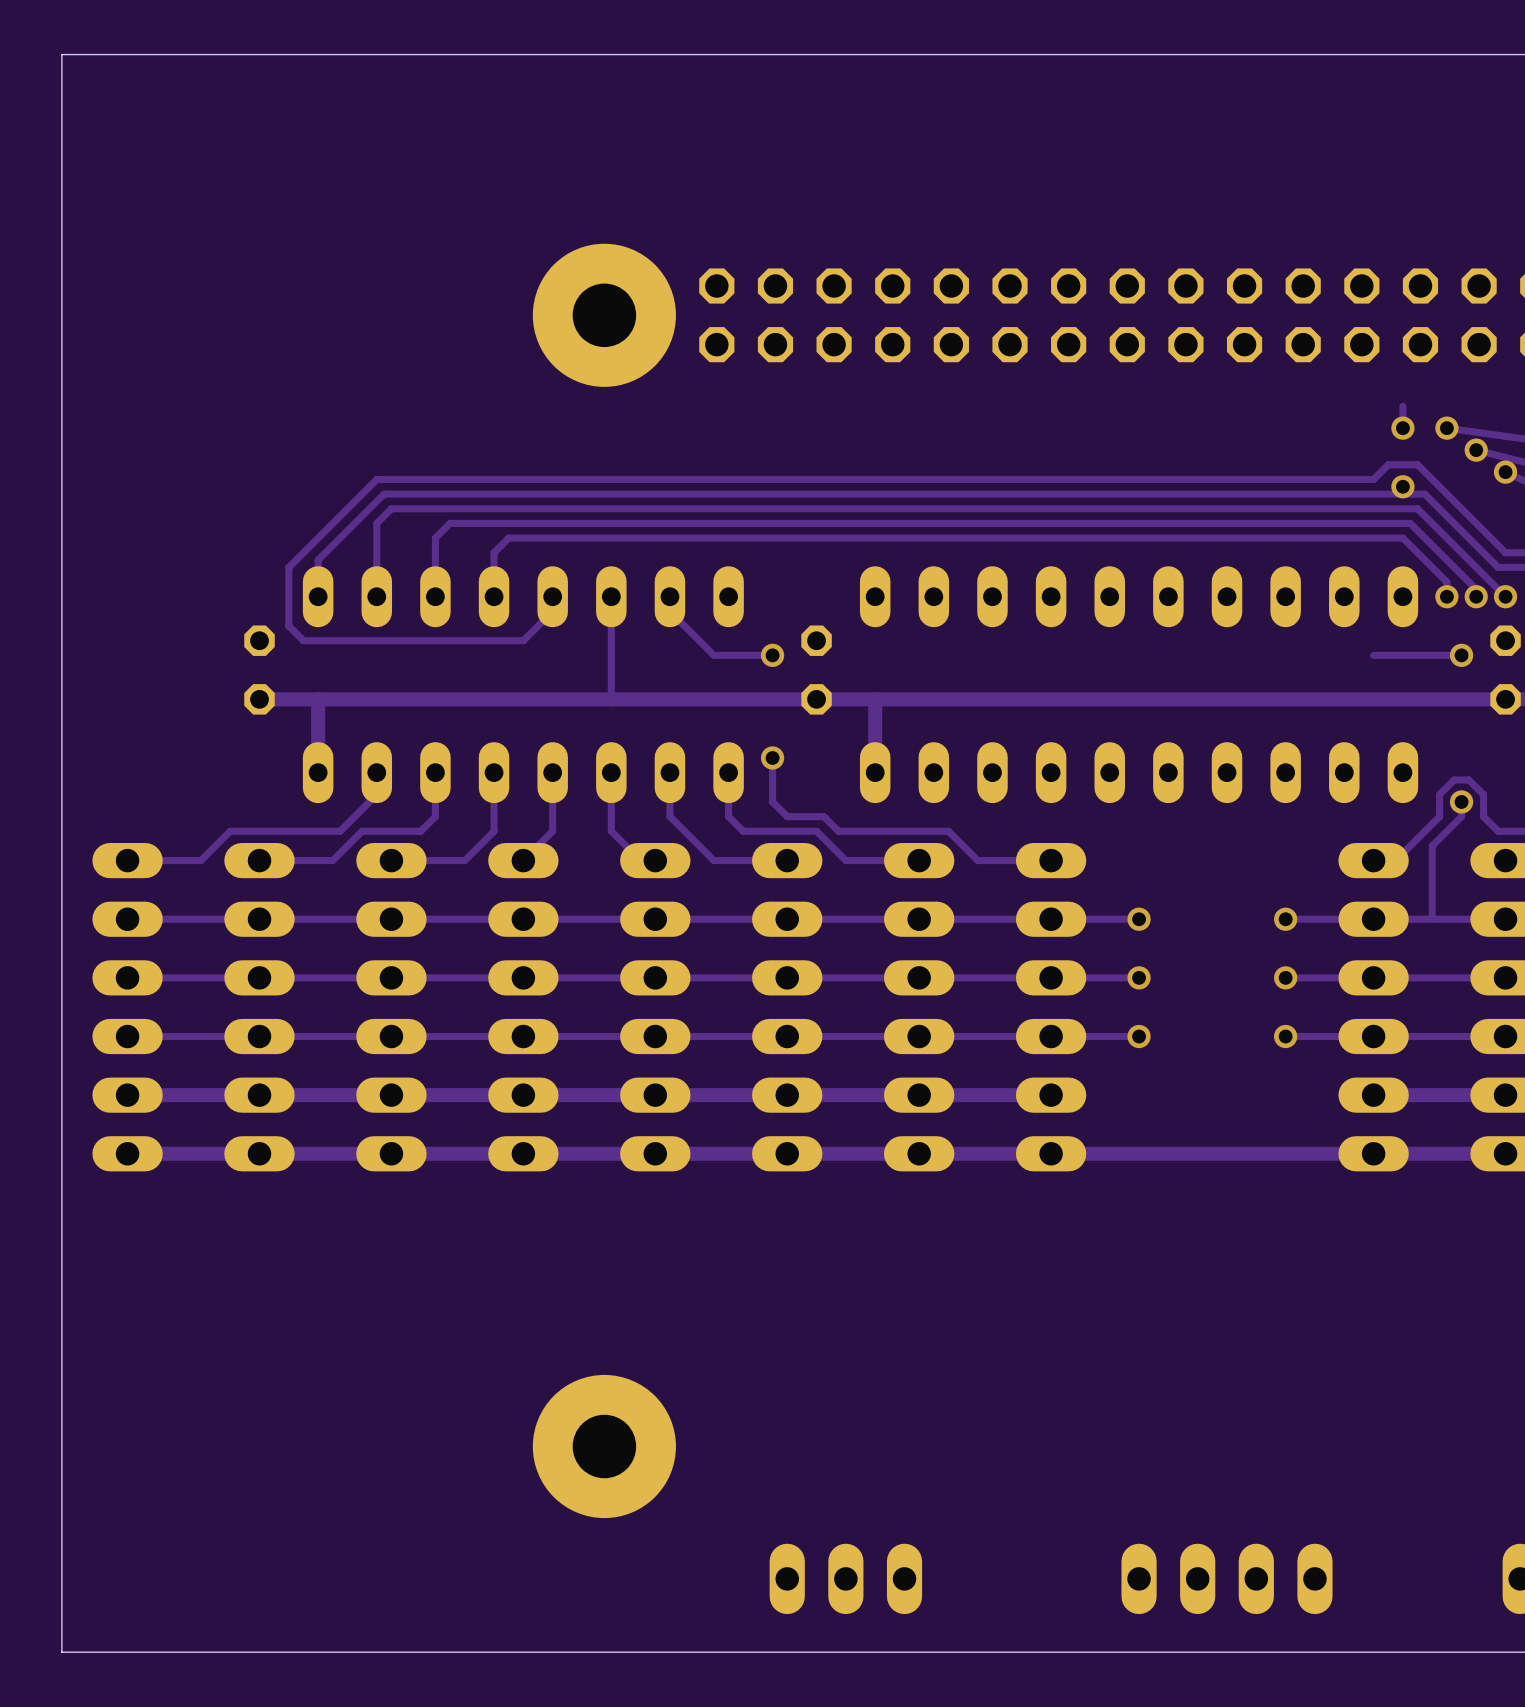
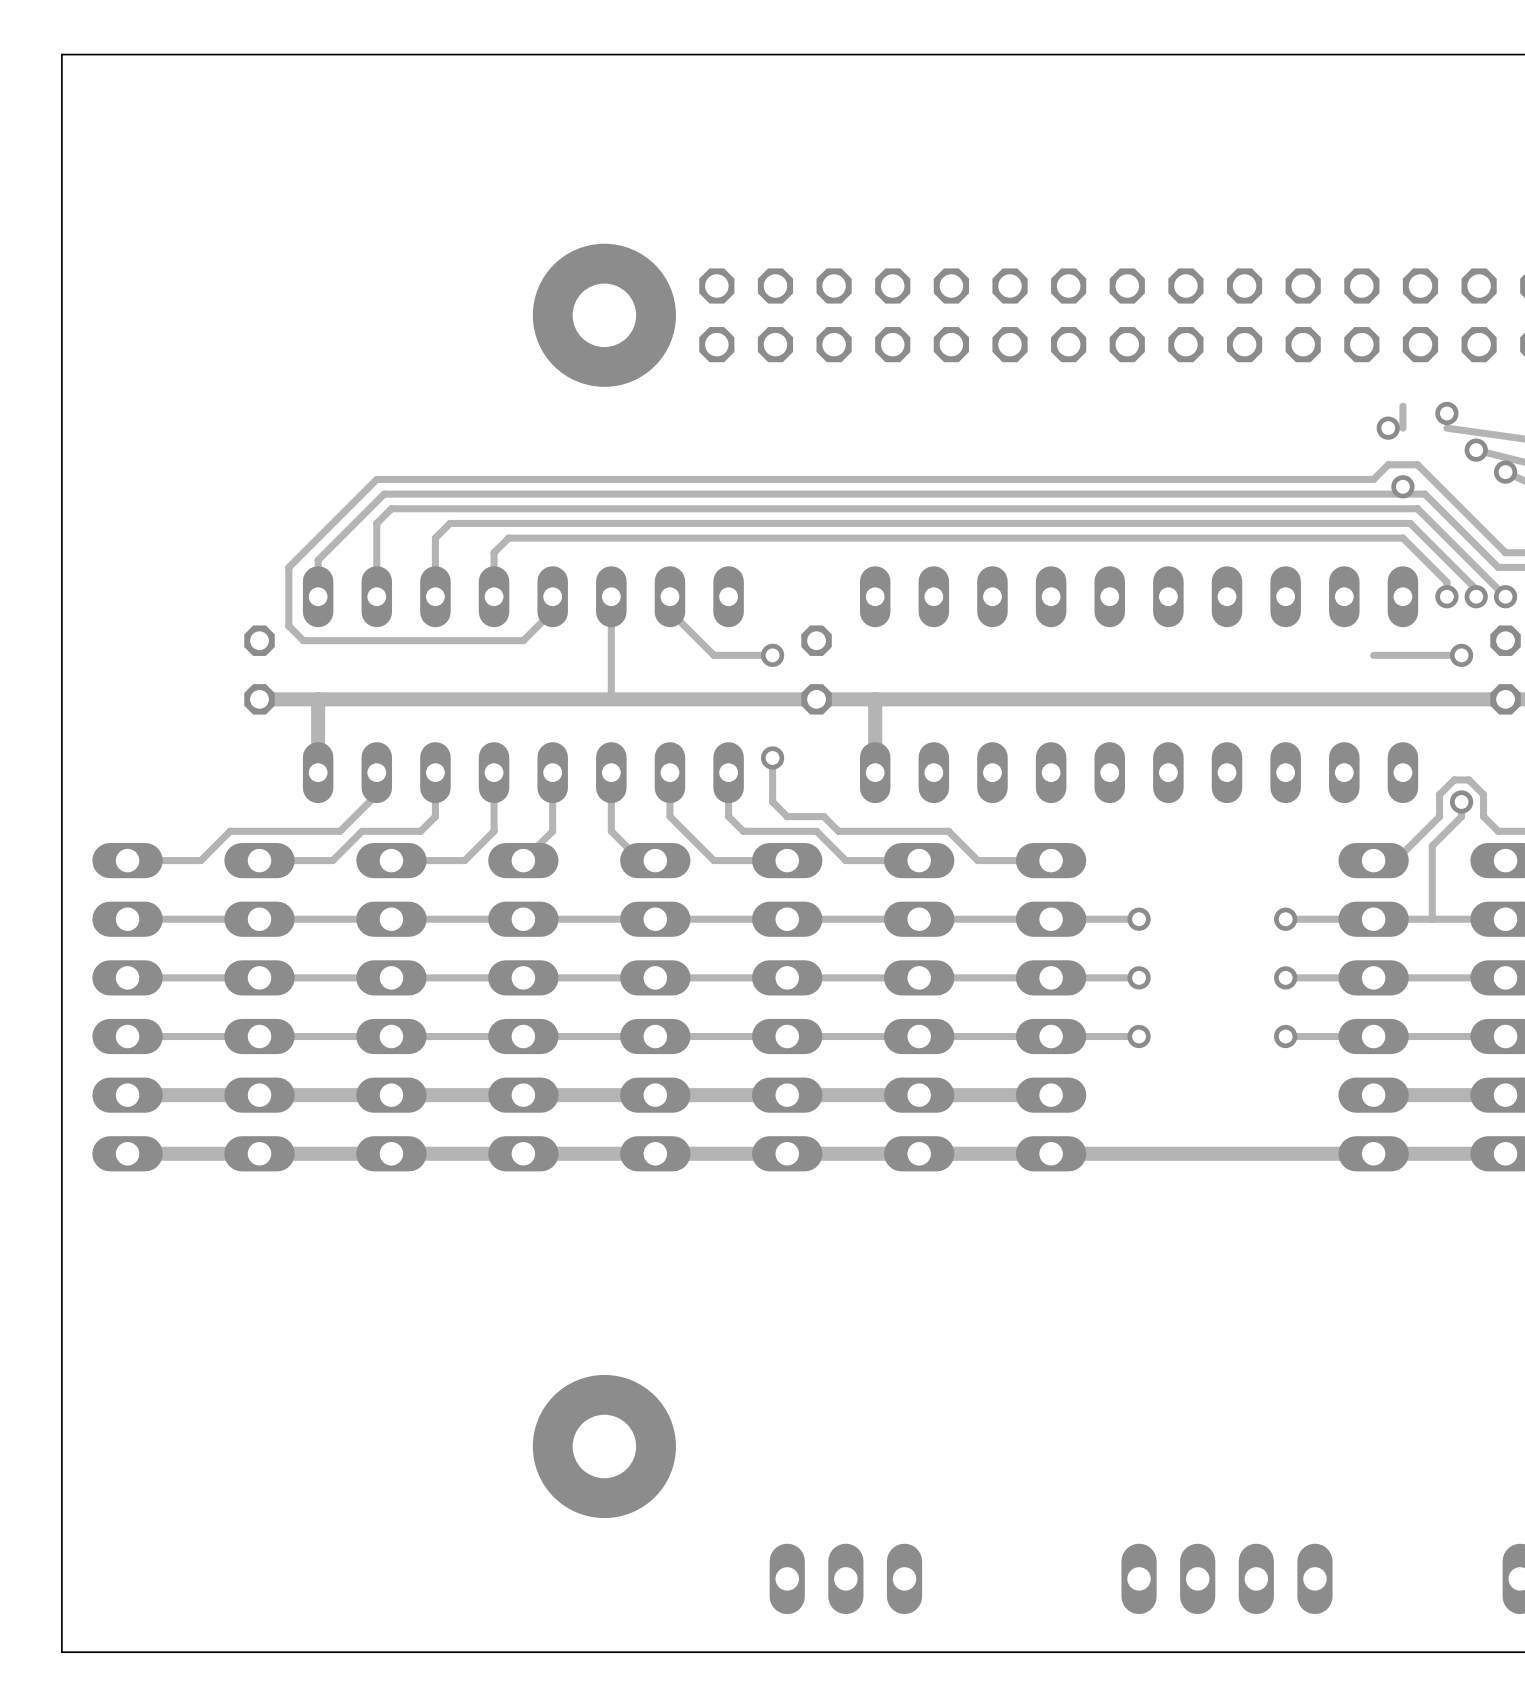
via position: (1402, 428) -> (1388, 428)
via position: (1446, 428) -> (1446, 413)

